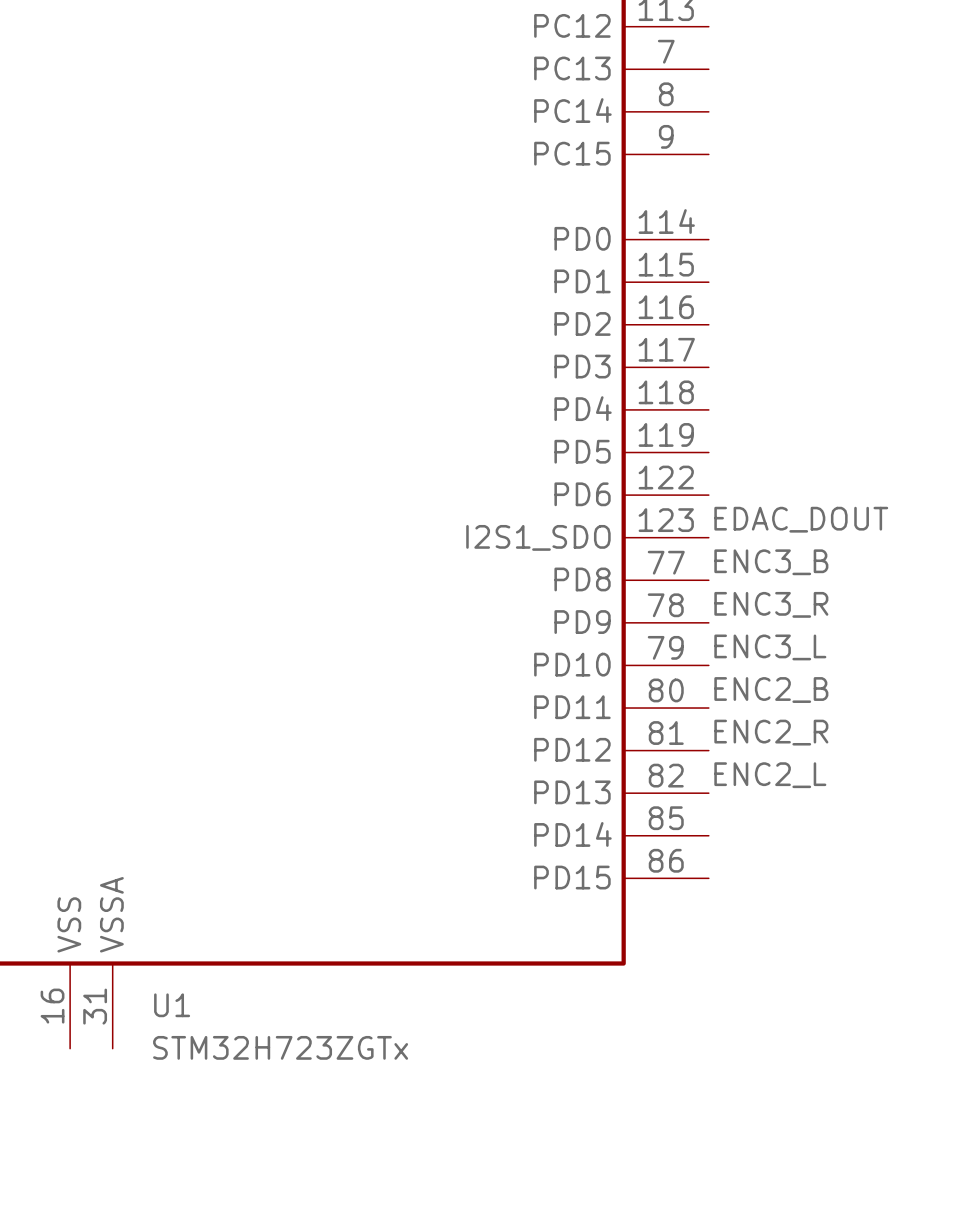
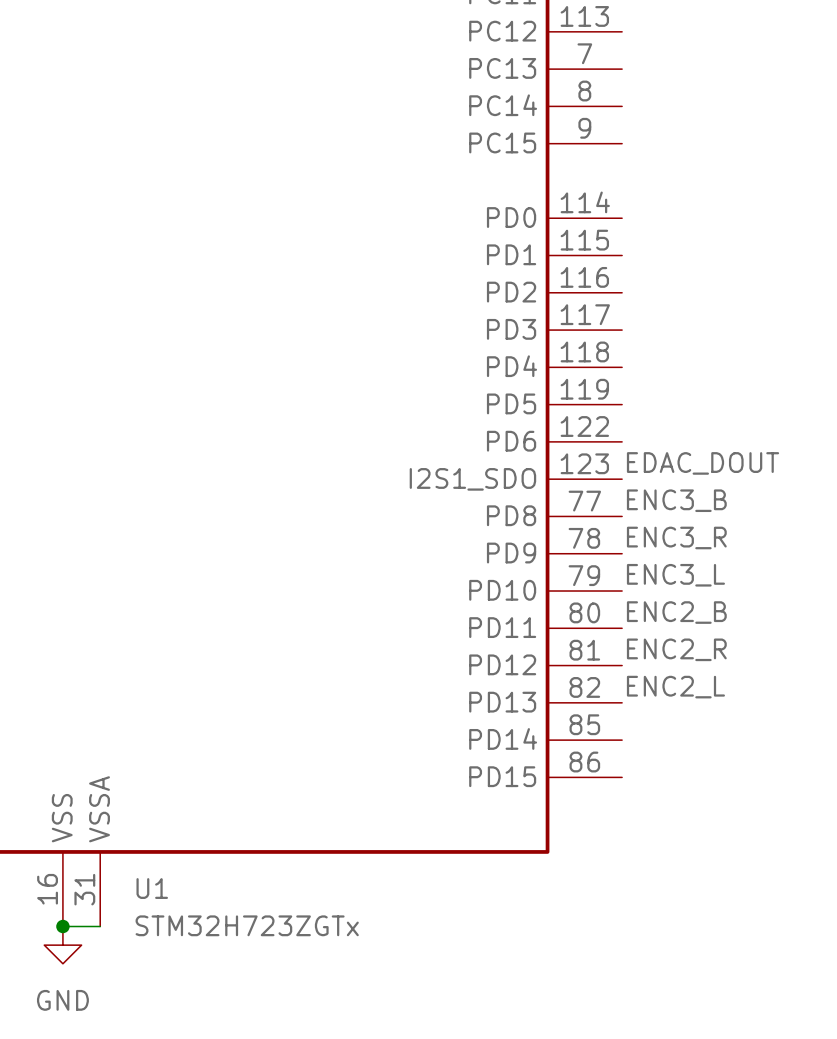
wire: none -> (62, 926) (100, 926)
junction: none -> (62, 926)
power symbol: none -> GND (62, 945)

